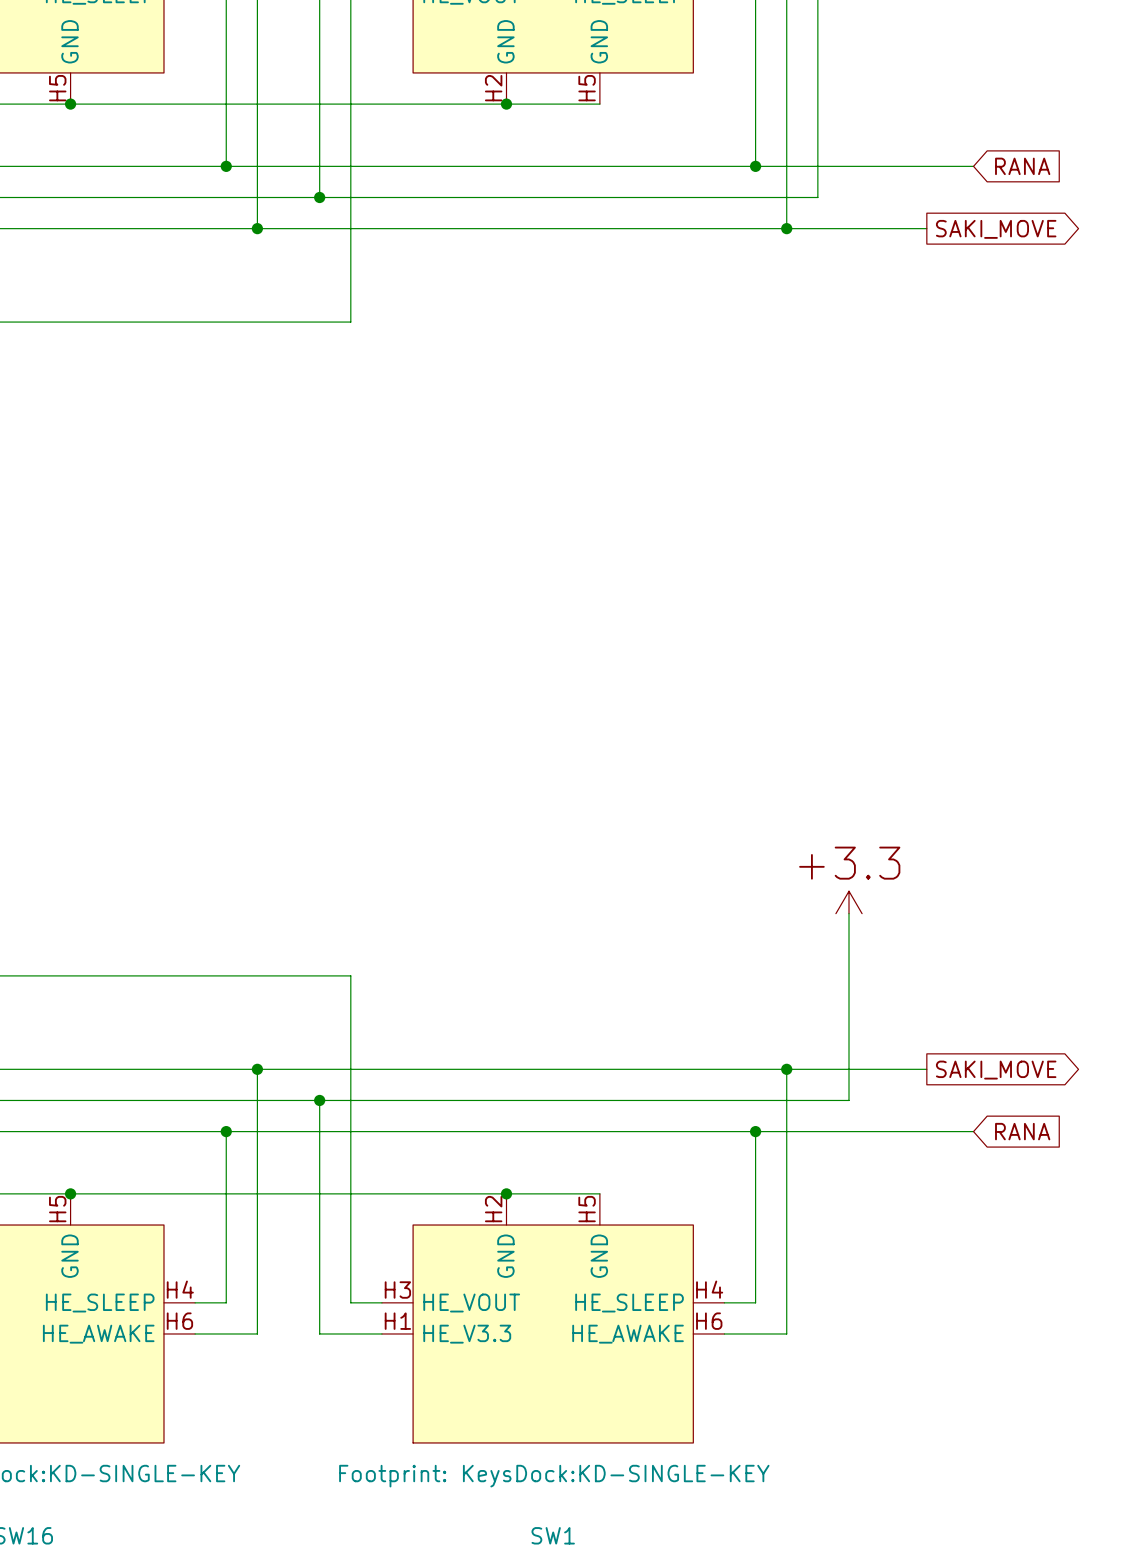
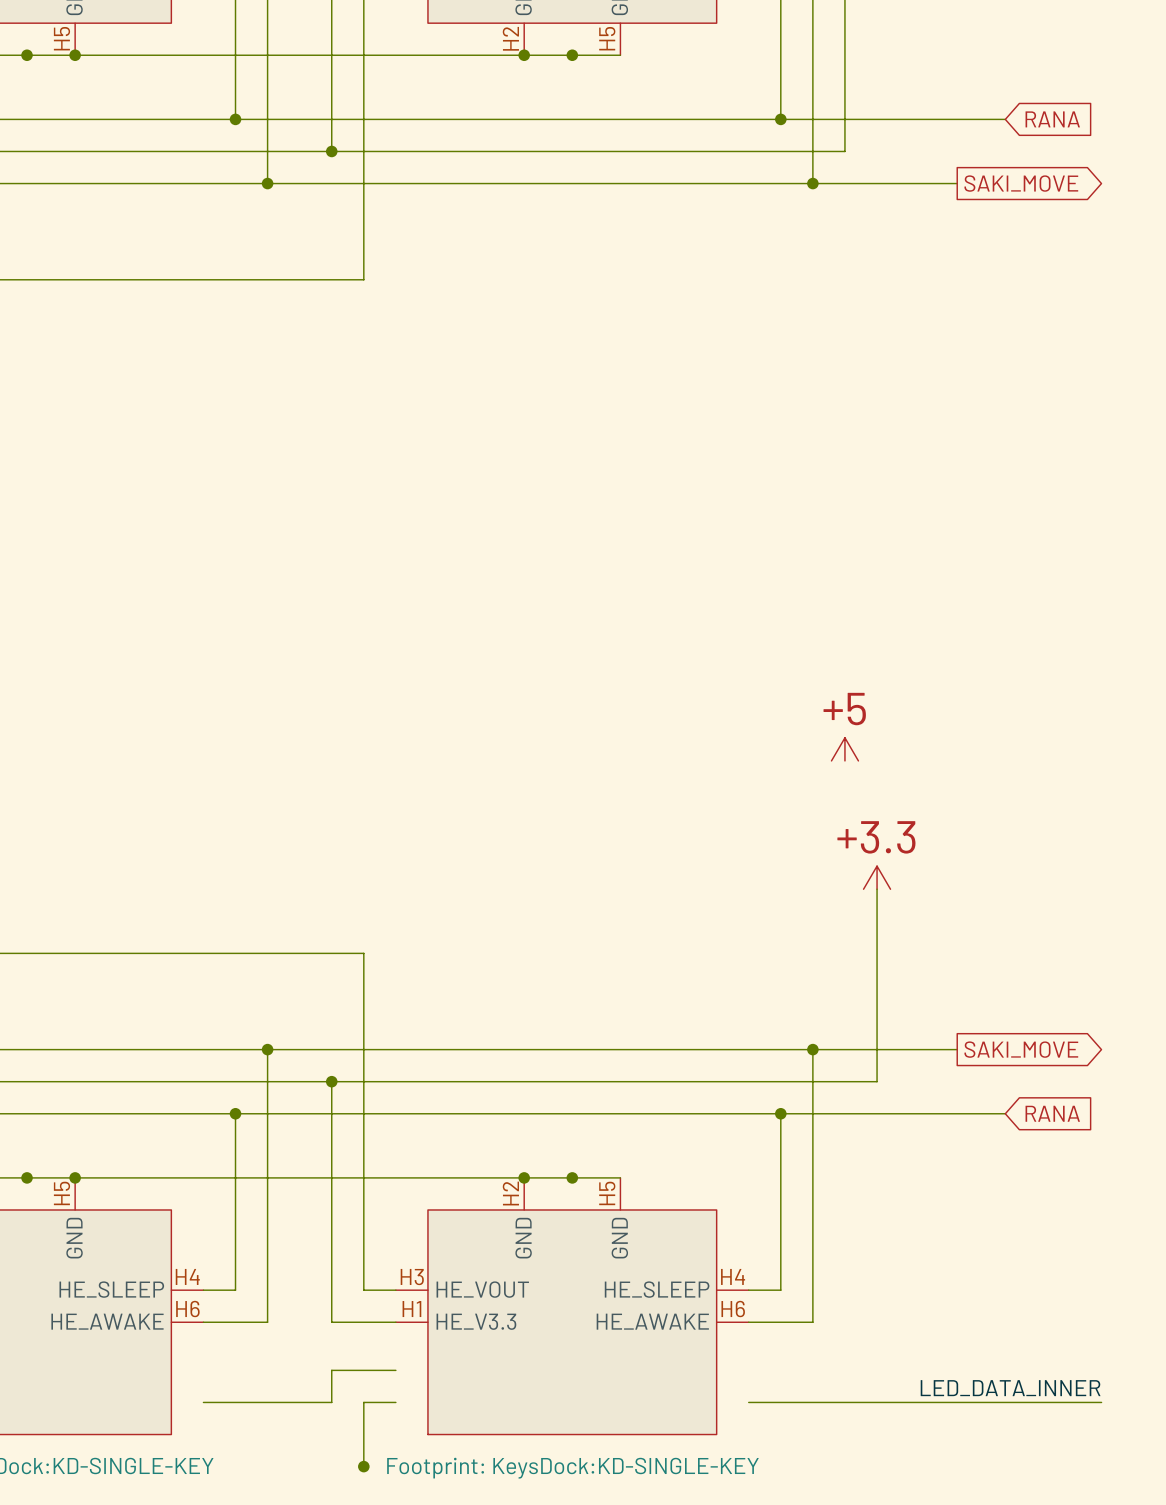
junction: none -> (27, 55)
junction: none -> (572, 55)
power symbol: none -> (844, 749)
junction: none -> (27, 1177)
junction: none -> (572, 1177)
wire: none -> (395, 1370) (331, 1370) (331, 1402) (203, 1402)
label: none -> LED_DATA_INNER (1010, 1388)
wire: none -> (395, 1402) (363, 1402) (363, 1466)
wire: none -> (748, 1402) (1101, 1402)
junction: none -> (363, 1466)

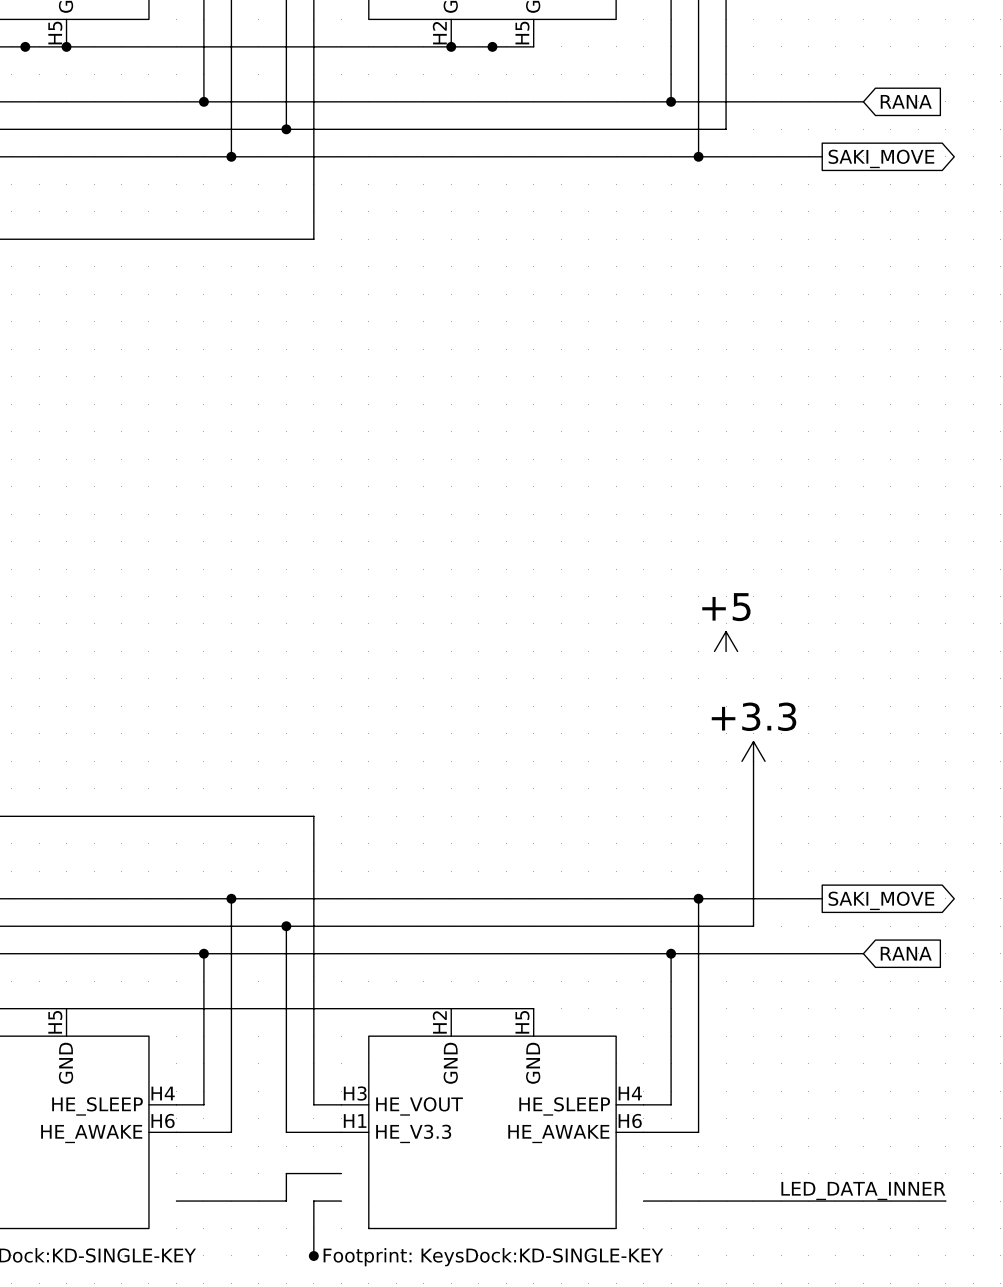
junction: (27, 1177) -> none
junction: (75, 1177) -> none
junction: (524, 1177) -> none
junction: (572, 1177) -> none

